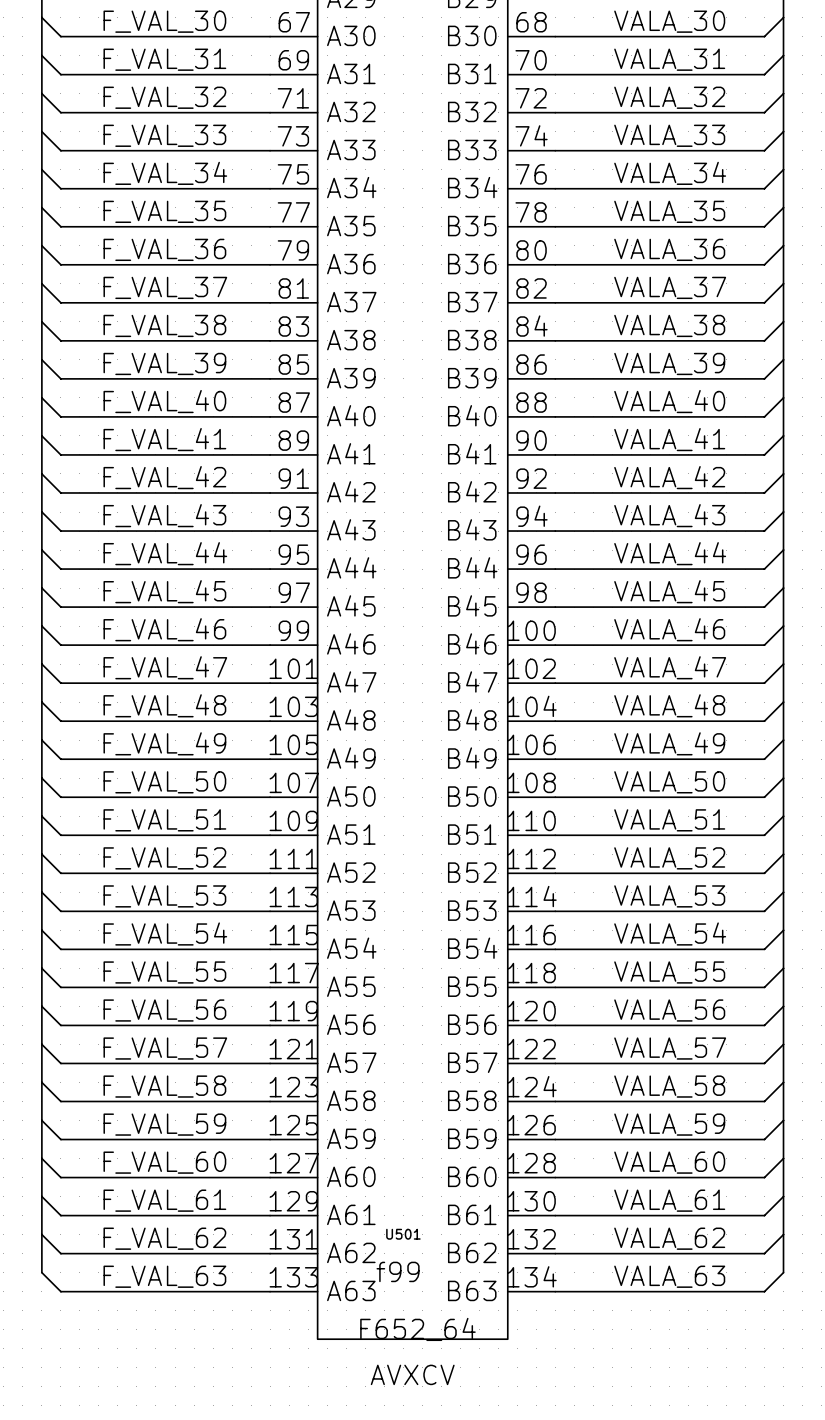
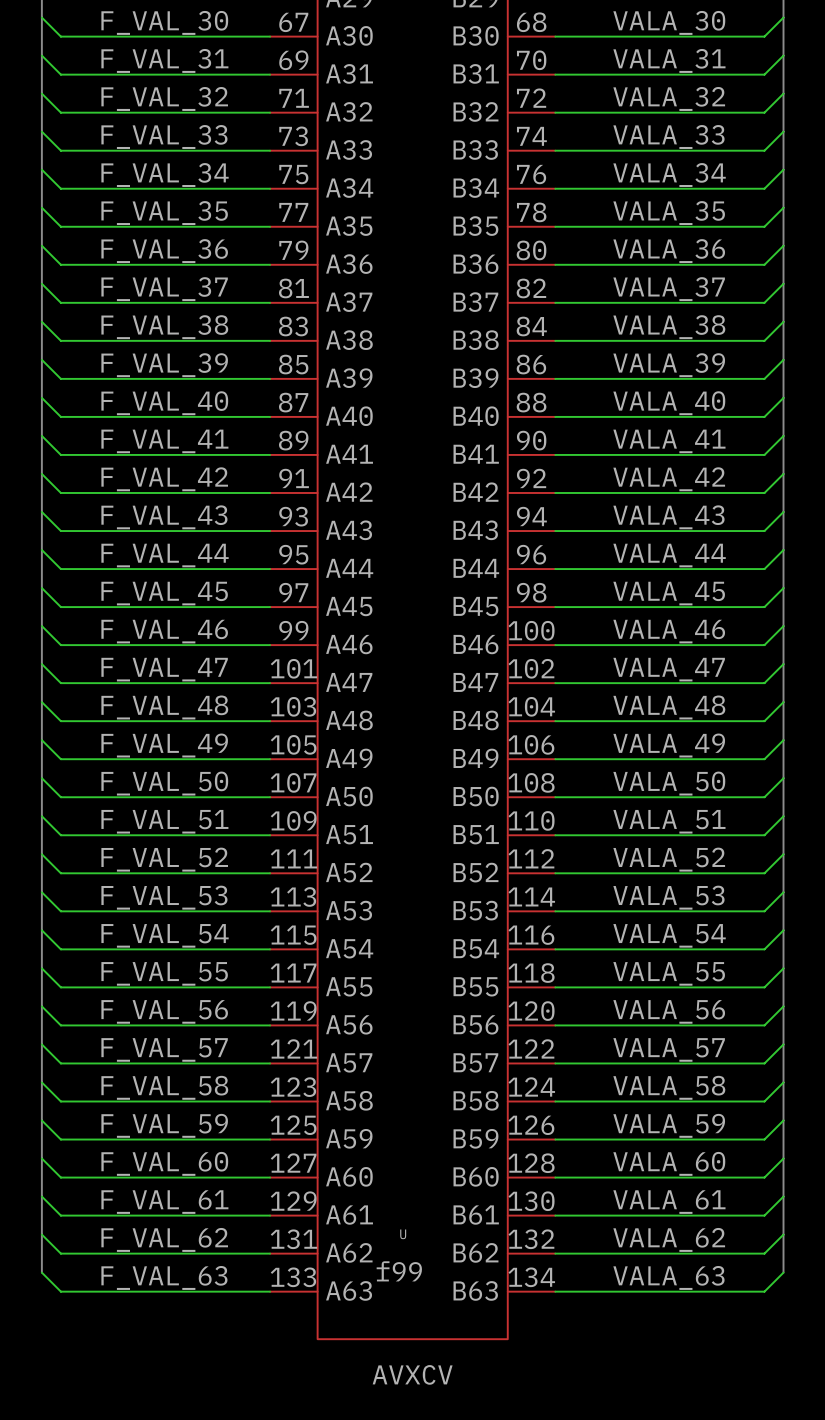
U501 name: U501 (403, 1234) -> U (403, 1234)
U501 value: F652_64 (417, 1329) -> none

